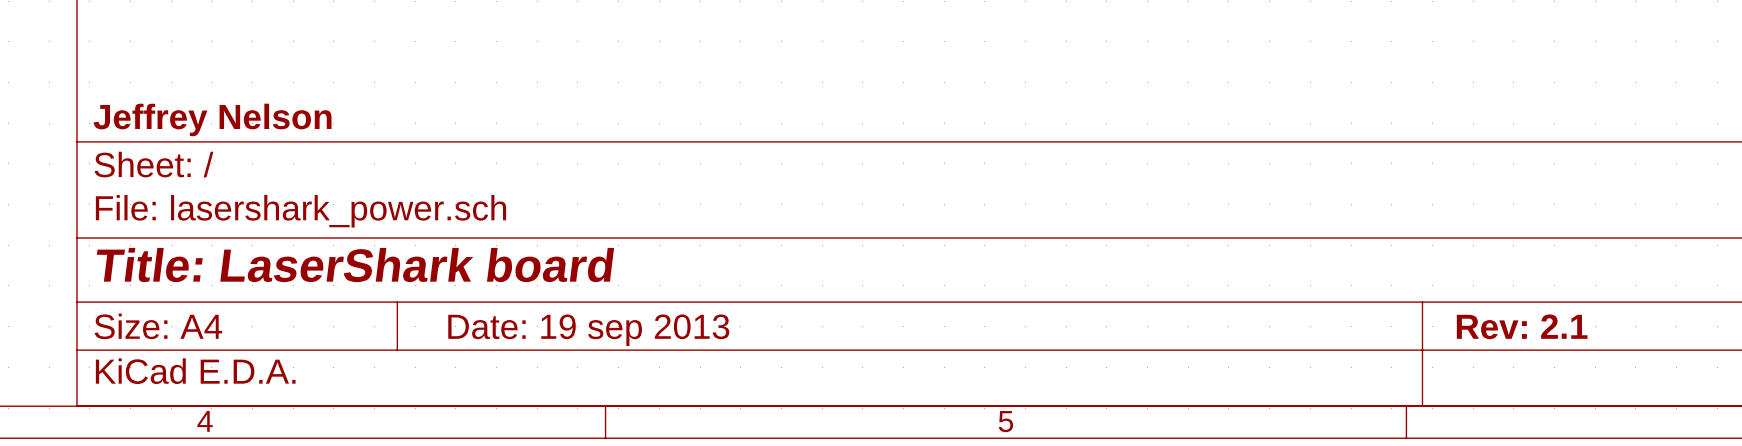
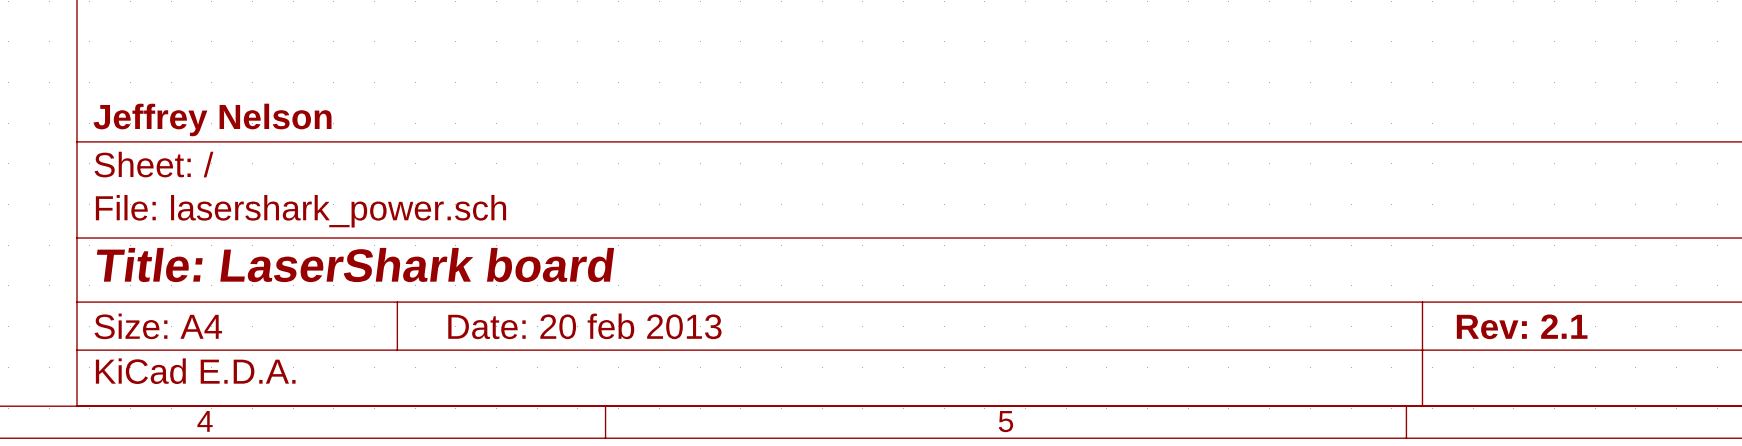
title block: Date: 19 sep 2013 (588, 330) -> Date: 20 feb 2013 (584, 326)

